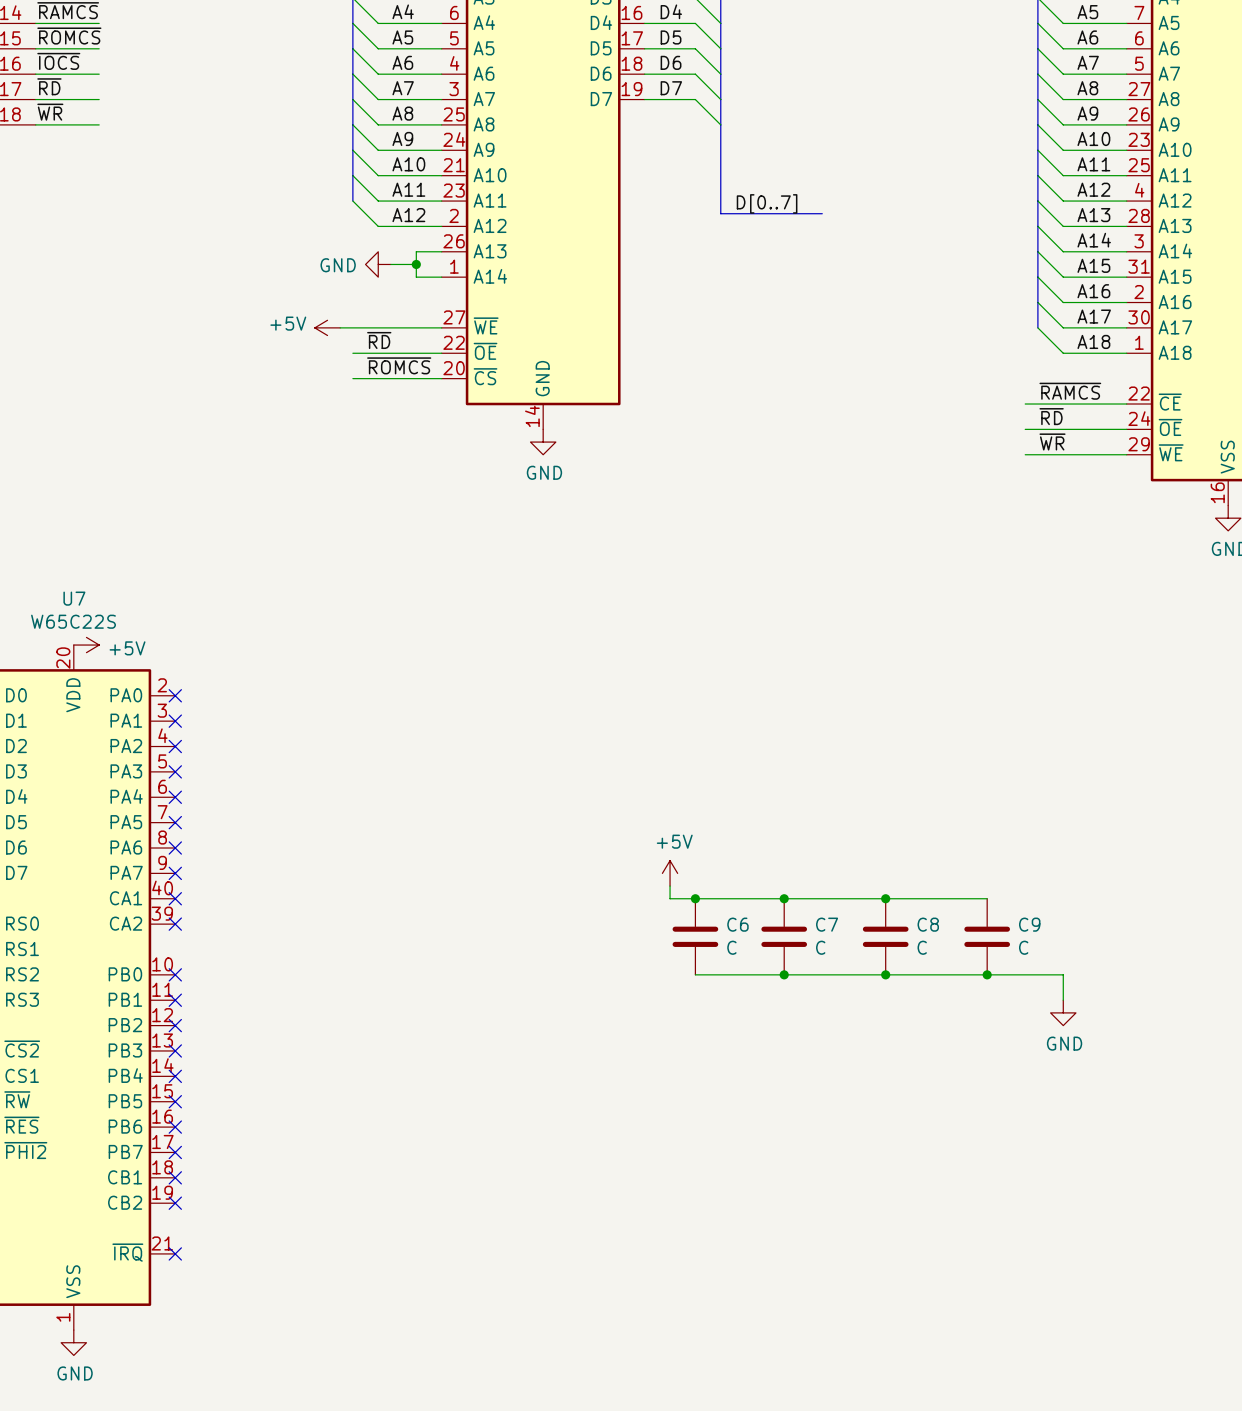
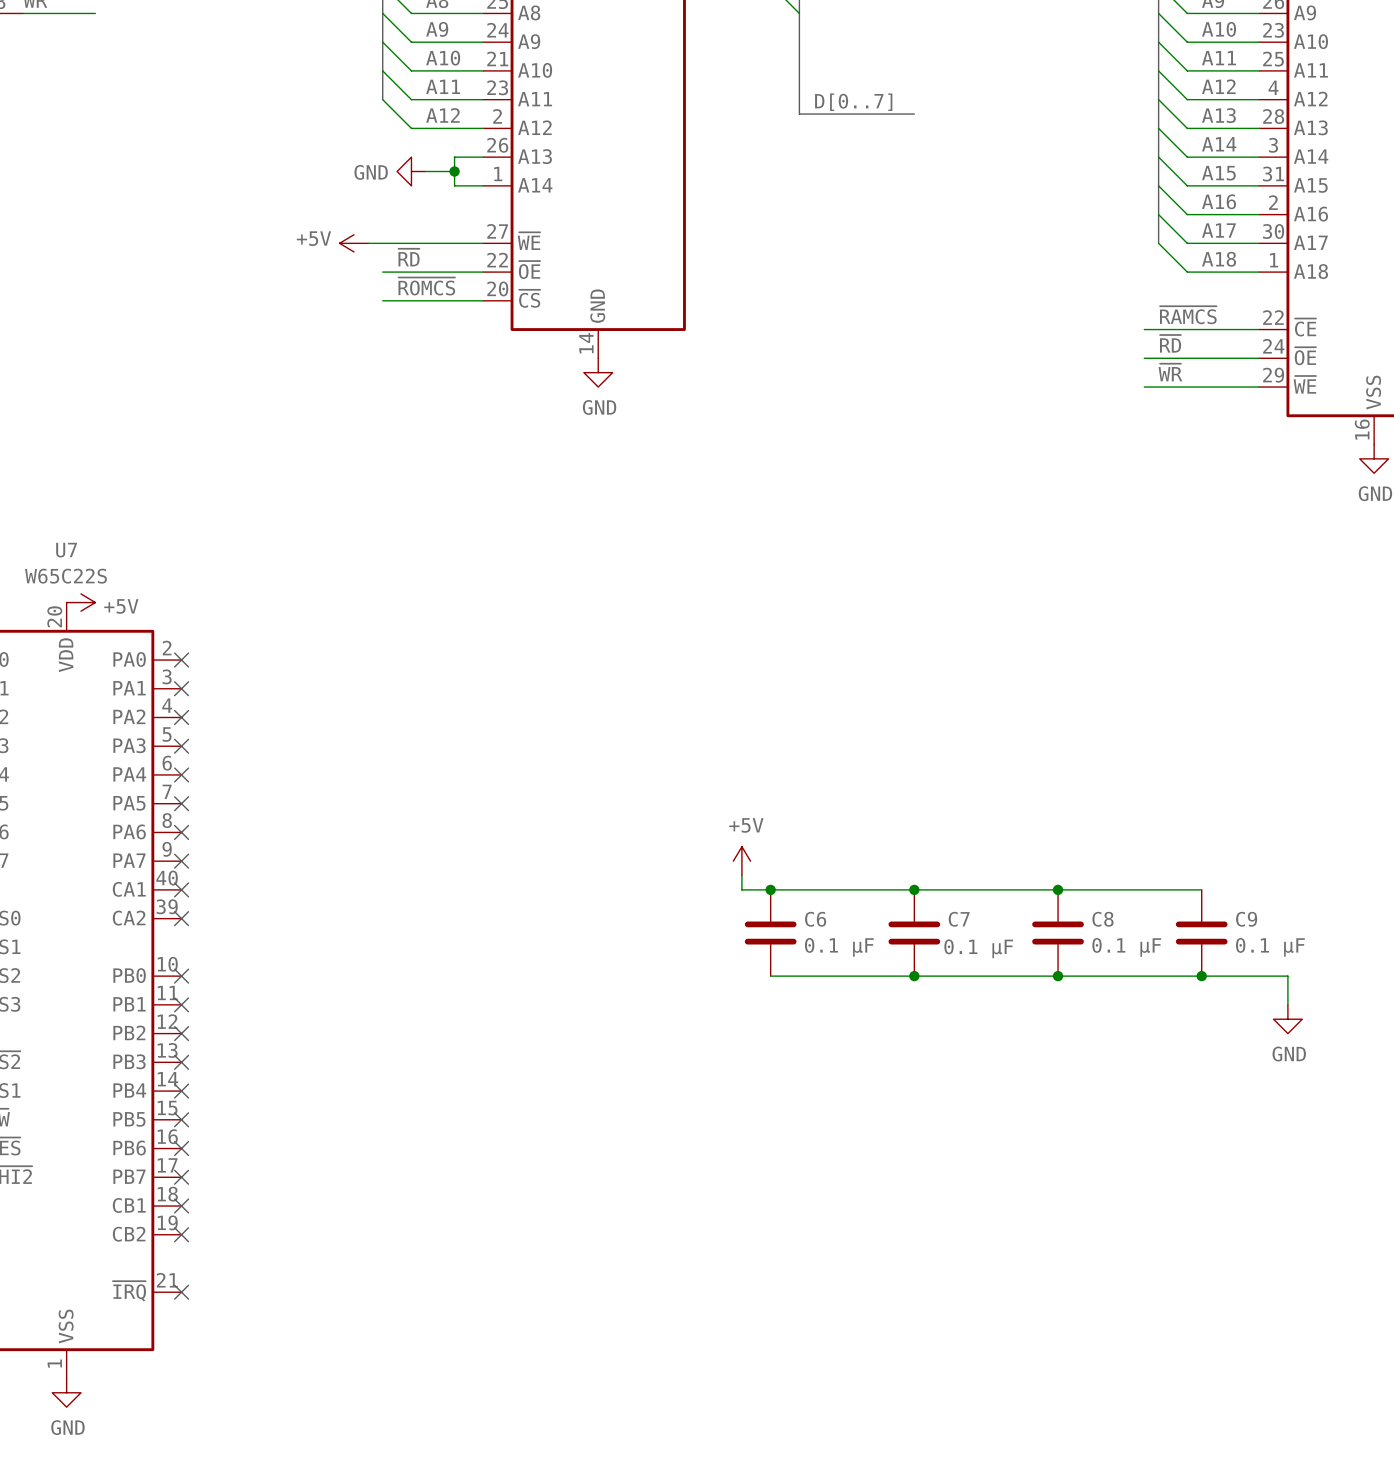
junction: (784, 898) -> none
junction: none -> (914, 889)
junction: (885, 898) -> none
junction: none -> (1058, 889)
wire: none -> (1101, 889) (1201, 889)
C7 position: (784, 936) -> (914, 933)
C8 position: (885, 936) -> (1058, 933)
C9 position: (987, 936) -> (1201, 933)
C6 value: C (731, 947) -> 0.1 µF (839, 947)
C7 value: C (820, 947) -> 0.1 µF (978, 948)
C8 value: C (922, 947) -> 0.1 µF (1126, 947)
C9 value: C (1023, 947) -> 0.1 µF (1270, 947)
junction: (784, 974) -> none
junction: none -> (914, 976)
junction: (885, 974) -> none
junction: none -> (1058, 976)
junction: (987, 974) -> none
wire: (1063, 974) (1063, 1000) -> (1187, 976) (1287, 976) (1287, 1004)
junction: none -> (1201, 976)
power symbol position: GND (1063, 1012) -> GND (1287, 1019)

